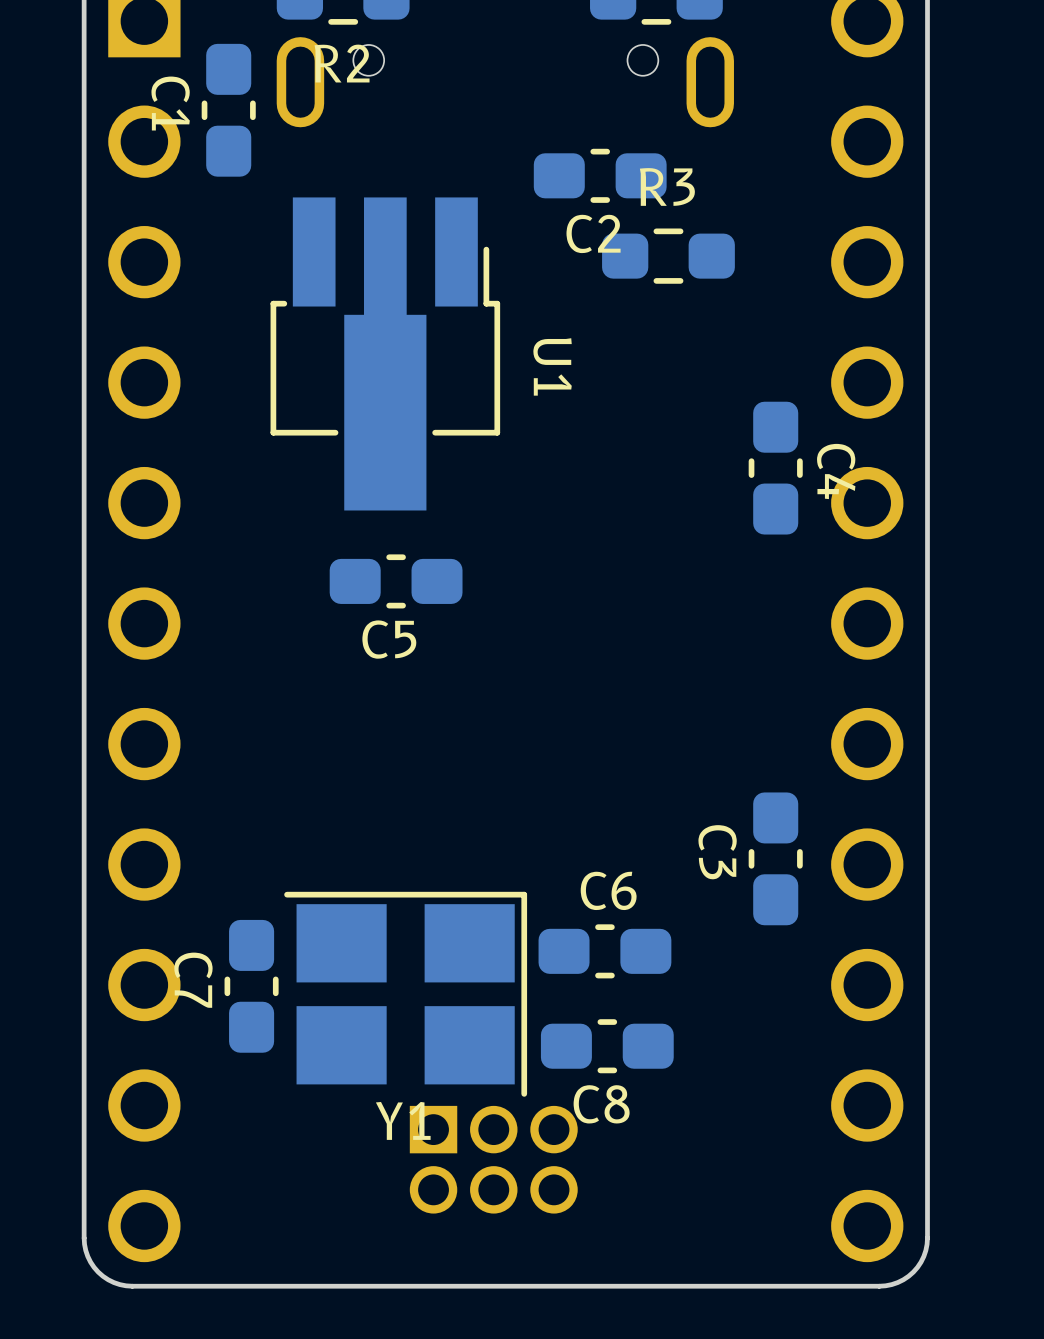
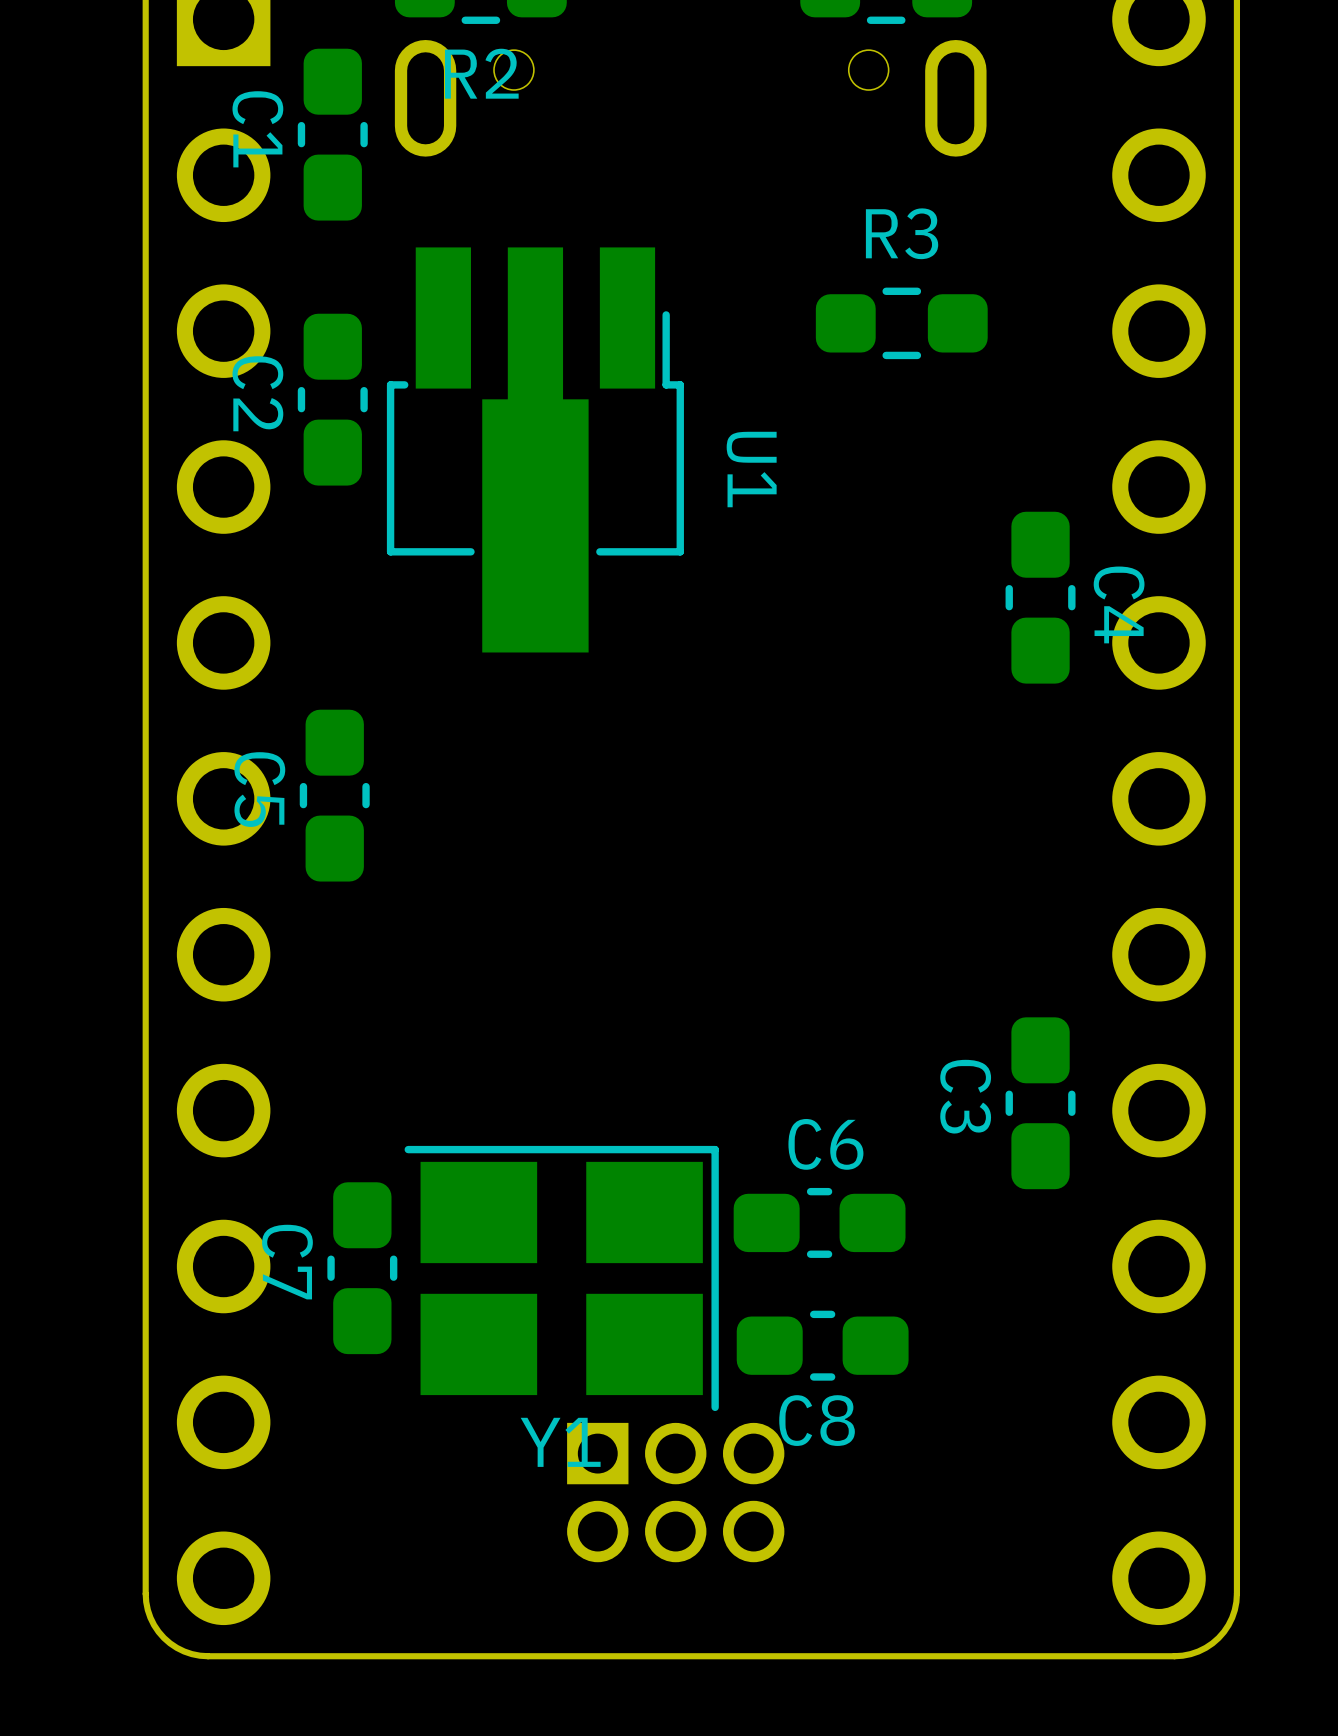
C2 rotation: 0° (600, 175) -> 90° clockwise (332, 399)
C2 position: (600, 175) -> (332, 399)
C5 rotation: 0° (396, 581) -> 90° clockwise (334, 795)
C5 position: (396, 581) -> (334, 795)

